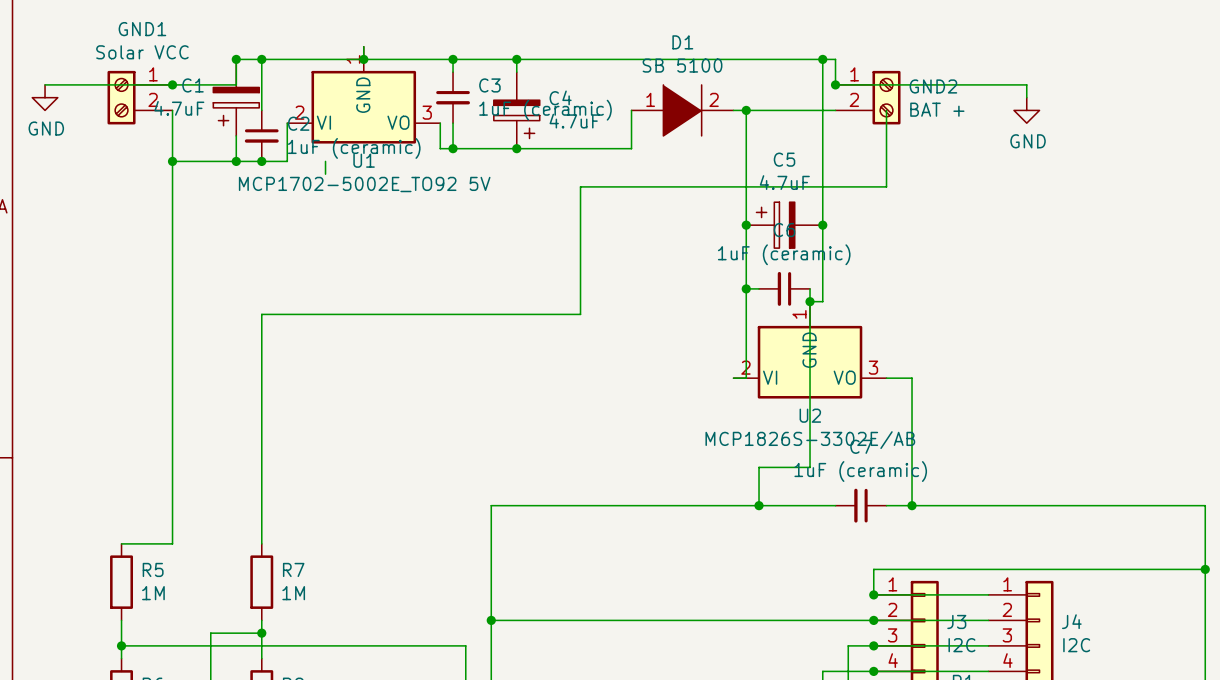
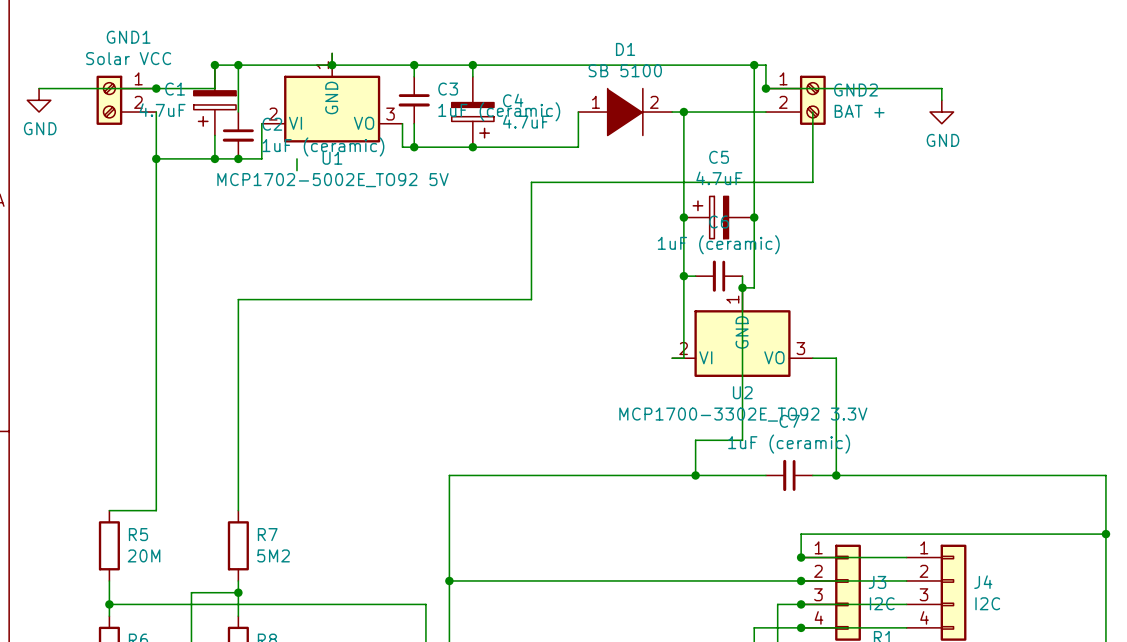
U2 value: MCP1826S-3302E/AB (810, 440) -> MCP1700-3302E_TO92 3.3V (743, 414)
R5 value: 1M (153, 593) -> 20M (144, 555)
R7 value: 1M (293, 593) -> 5M2 (273, 555)

